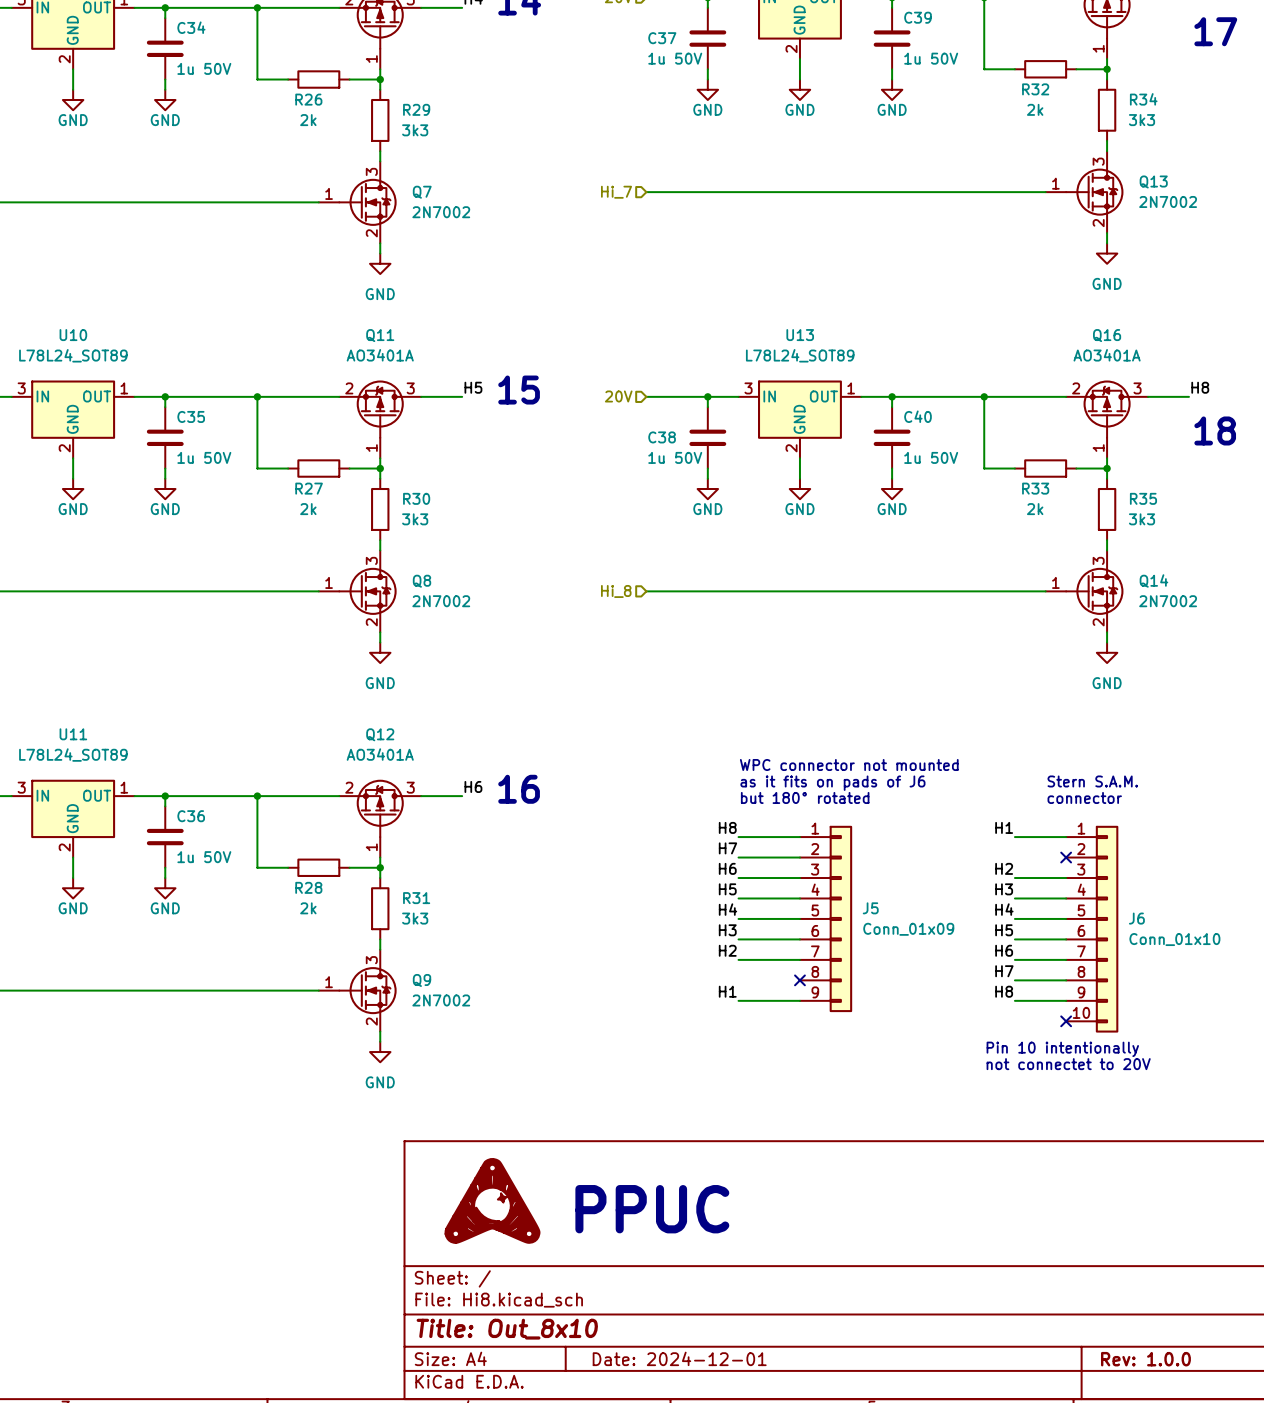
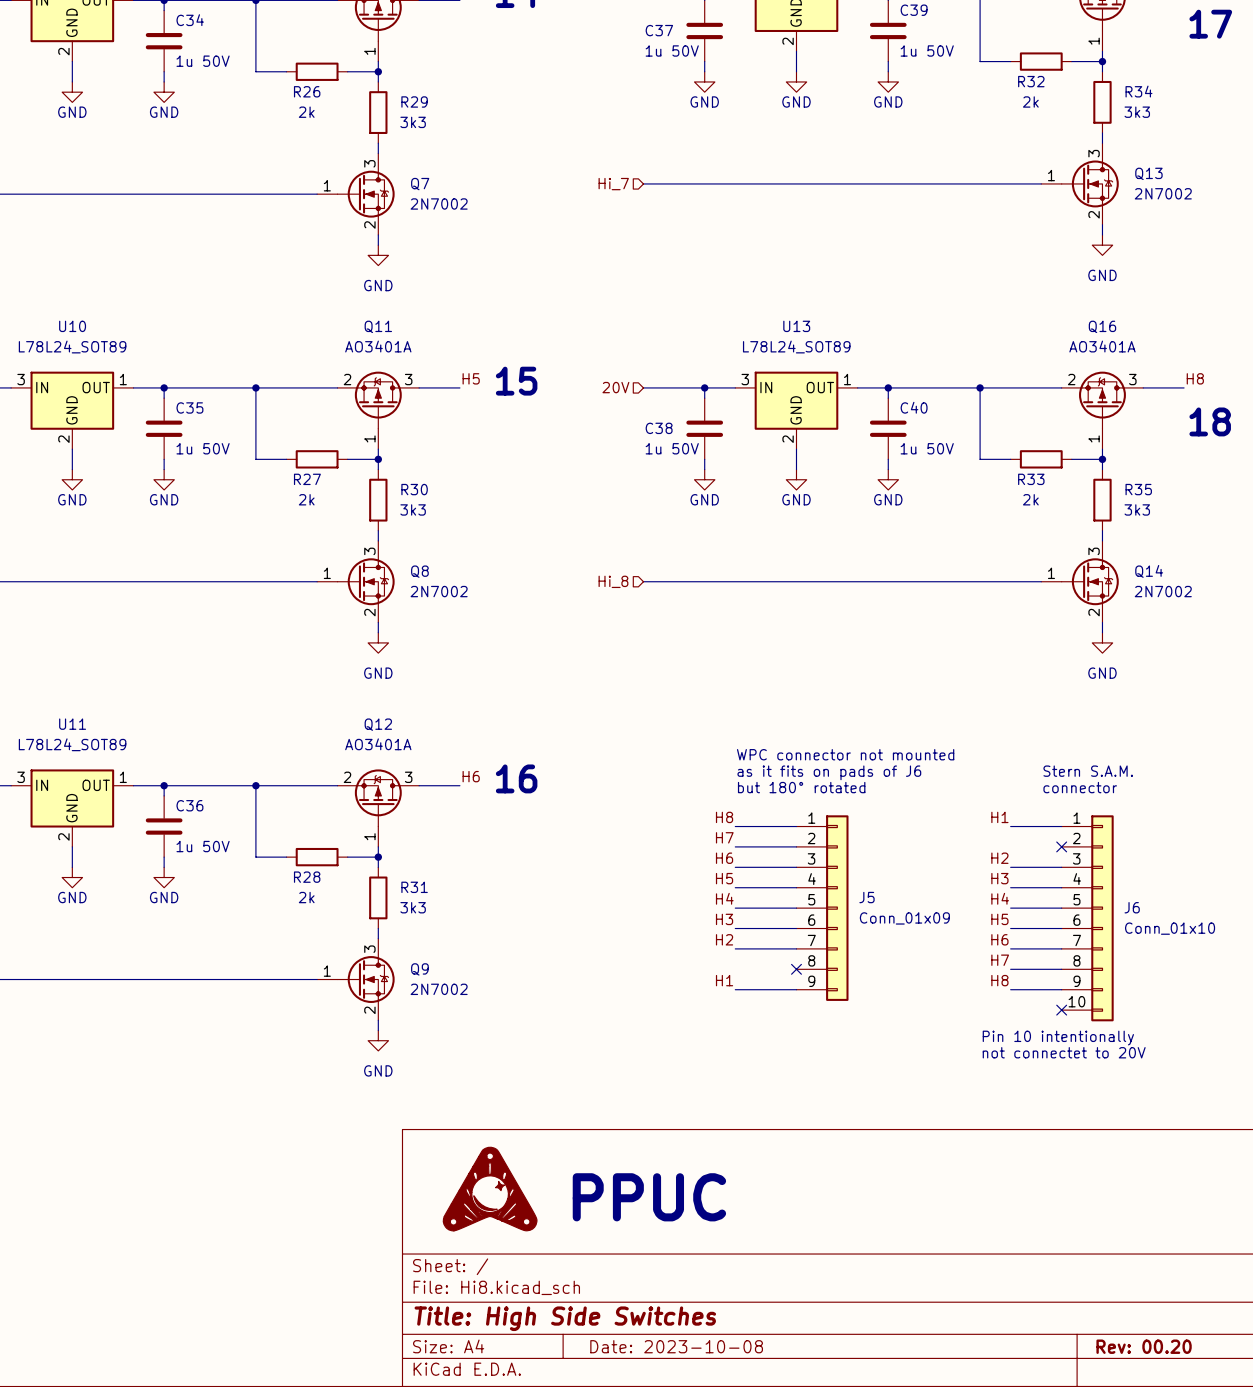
title block: Title: Out_8x10 (507, 1329) -> Title: High Side Switches (565, 1318)
title block: Date: 2024-12-01 (679, 1358) -> Date: 2023-10-08 (676, 1346)
title block: Rev: 1.0.0 (1145, 1359) -> Rev: 00.20 (1144, 1346)

